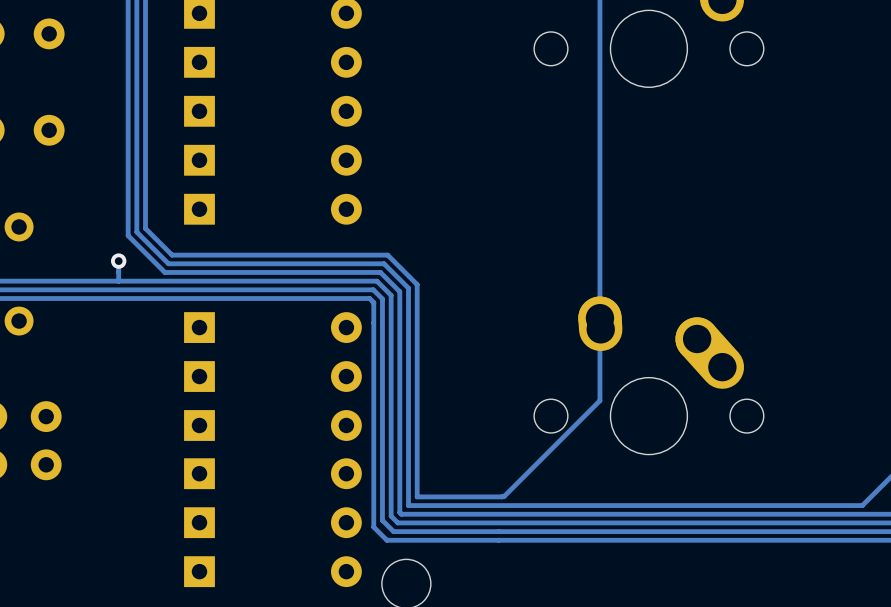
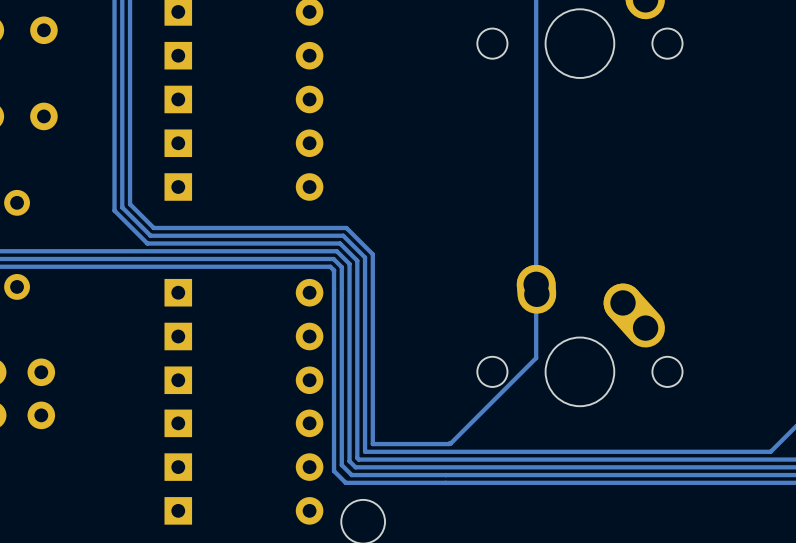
track: (118, 261) (118, 281) -> none
via: (118, 261) -> none

